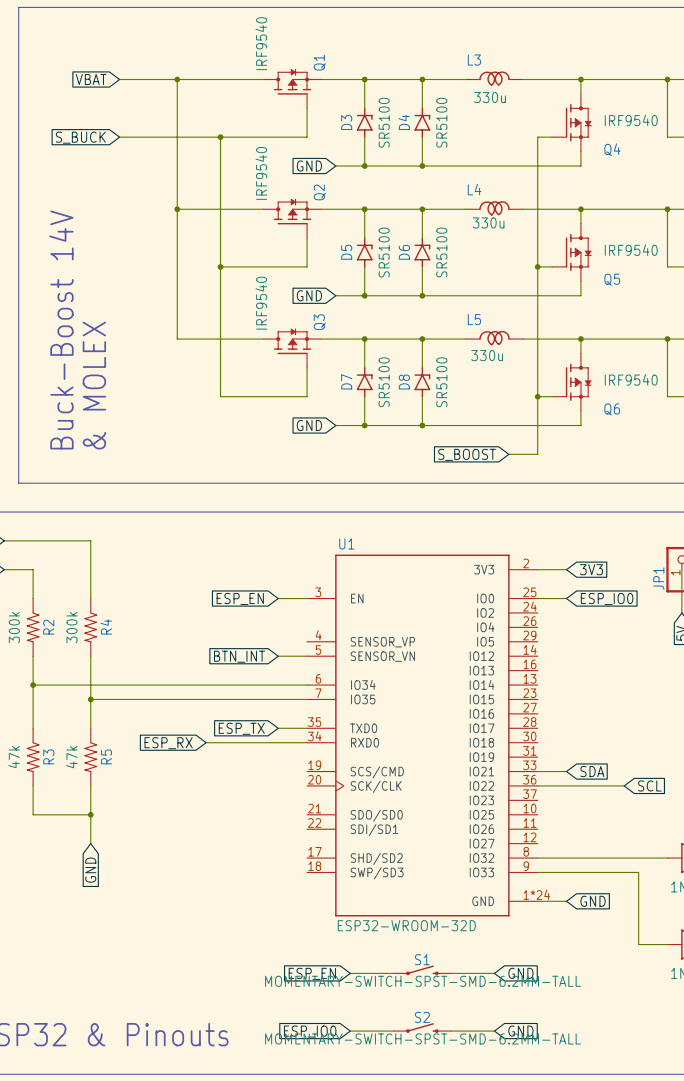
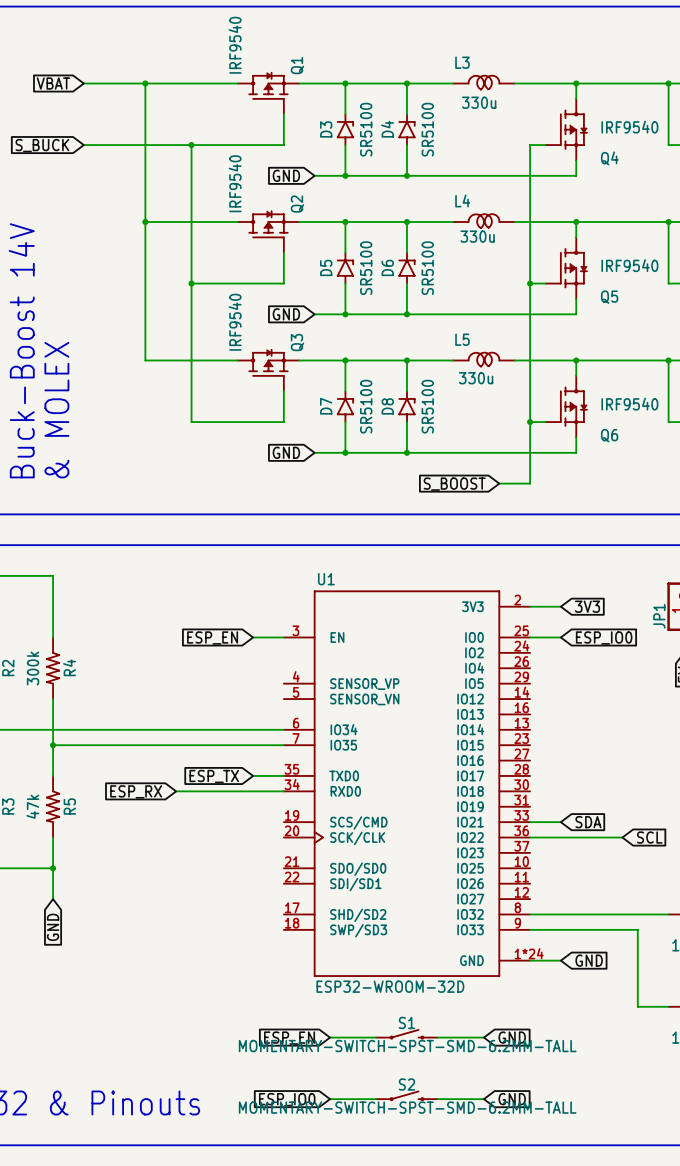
global label: BTN_INT (239, 656) -> none
wire: (278, 656) (307, 656) -> none

